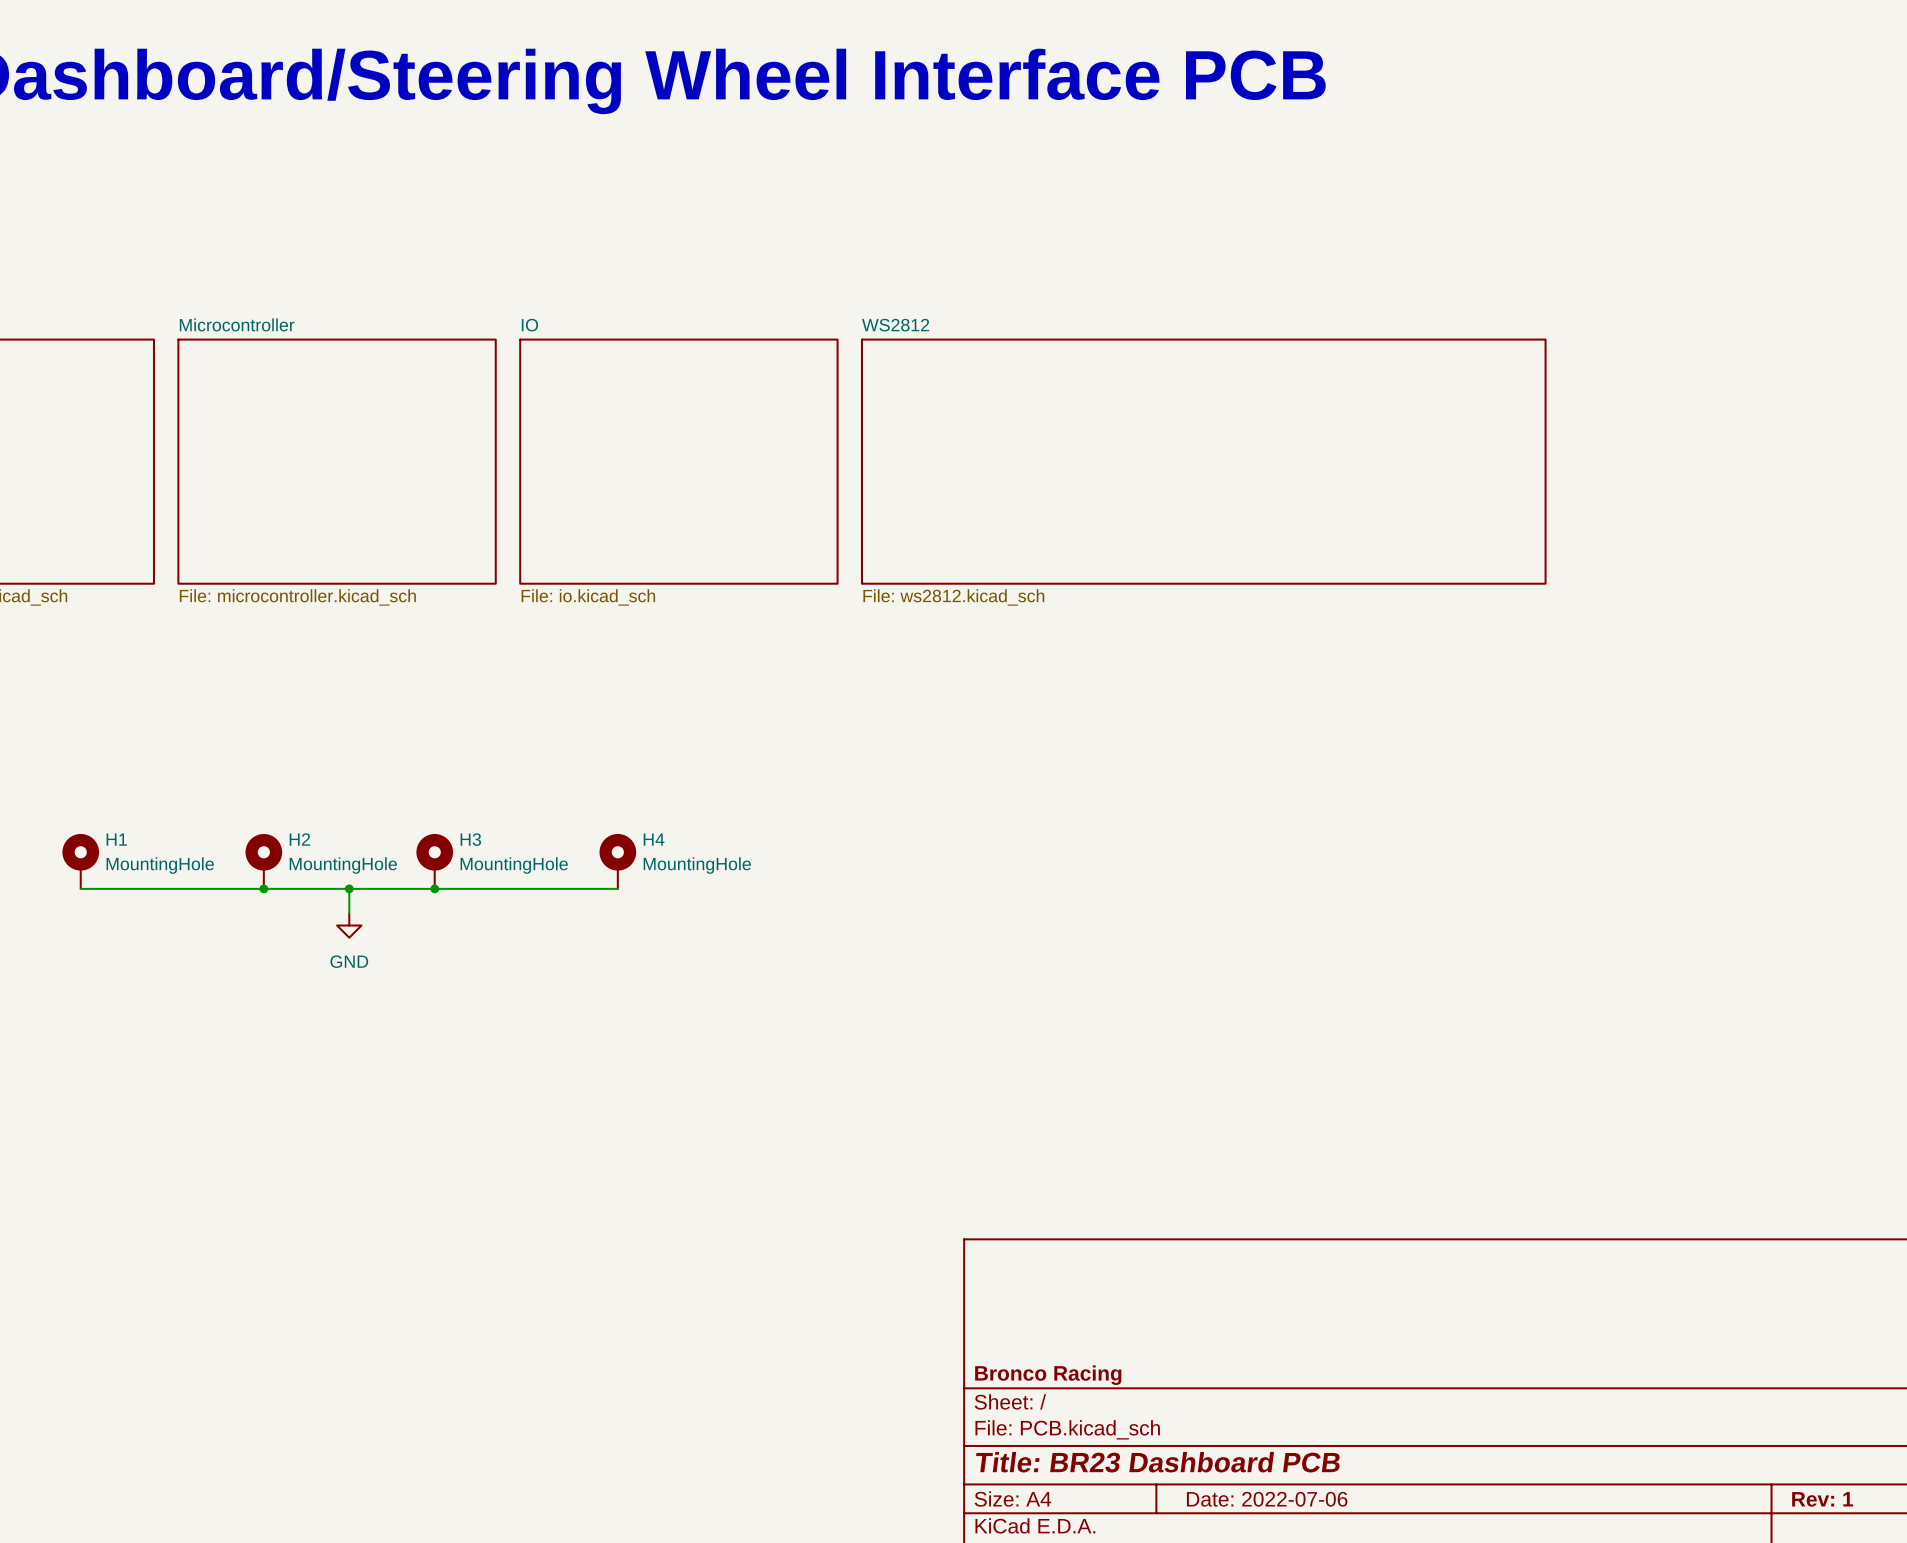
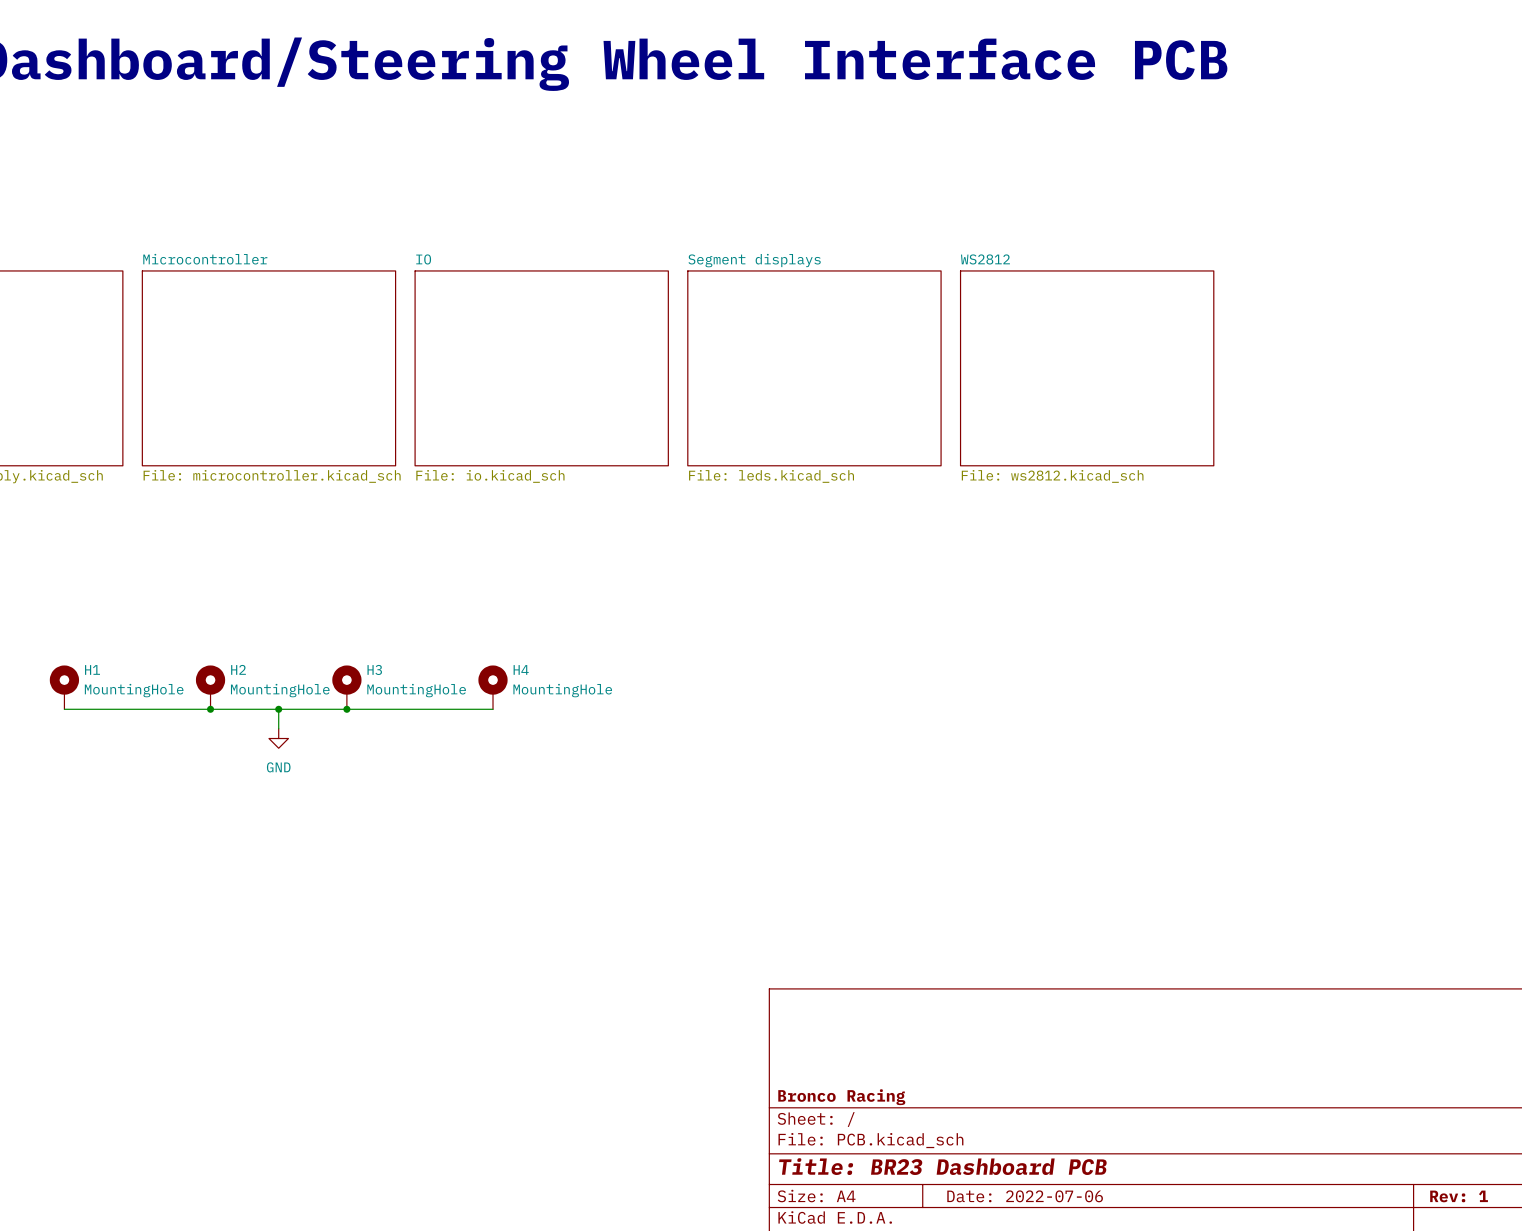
sheet WS2812 name position: WS2812 (895, 325) -> WS2812 (985, 259)
sheet WS2812 shape: [861, 338, 1547, 585] -> [959, 270, 1215, 467]
sheet Segment displays: none -> File: leds.kicad_sch (814, 368)
sheet WS2812 value position: File: ws2812.kicad_sch (953, 597) -> File: ws2812.kicad_sch (1052, 476)

